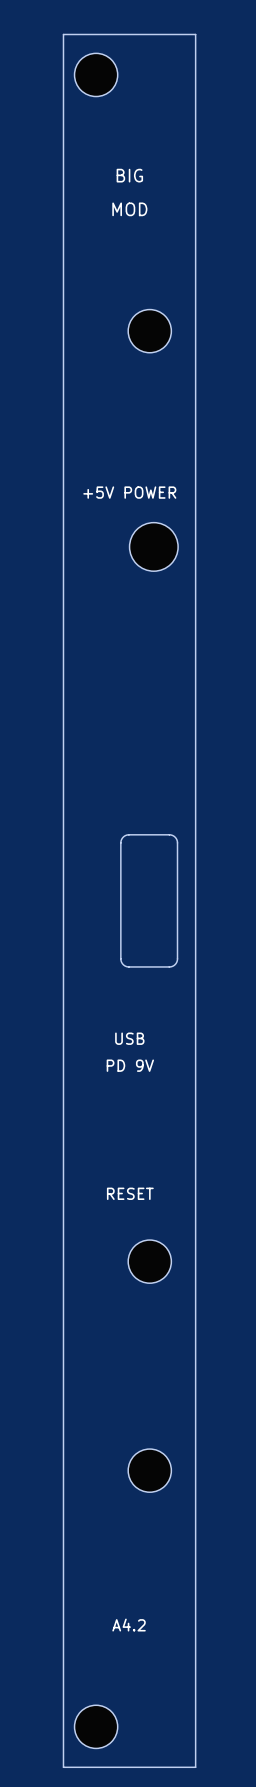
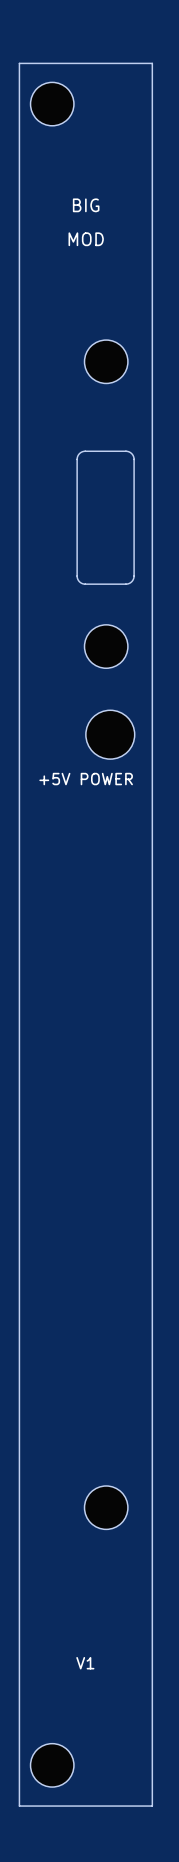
board edge: none -> (85, 451) (126, 451) (133, 456) (134, 576) (132, 580) (128, 583) (84, 584) (77, 578) (77, 458) (80, 453) (85, 451)
text position: +5V POWER (129, 492) -> +5V POWER (86, 779)
part position: (153, 546) -> (110, 734)
part: none -> (106, 646)
board edge: (128, 834) (170, 834) (177, 840) (177, 958) (172, 966) (128, 966) (121, 961) (120, 842) (123, 837) (128, 834) -> none
text: USB (129, 1038) -> none
text: PD 9V (130, 1065) -> none
text: RESET (130, 1193) -> none
part: (149, 1261) -> none
text: A4.2 (129, 1625) -> V1 (85, 1663)

